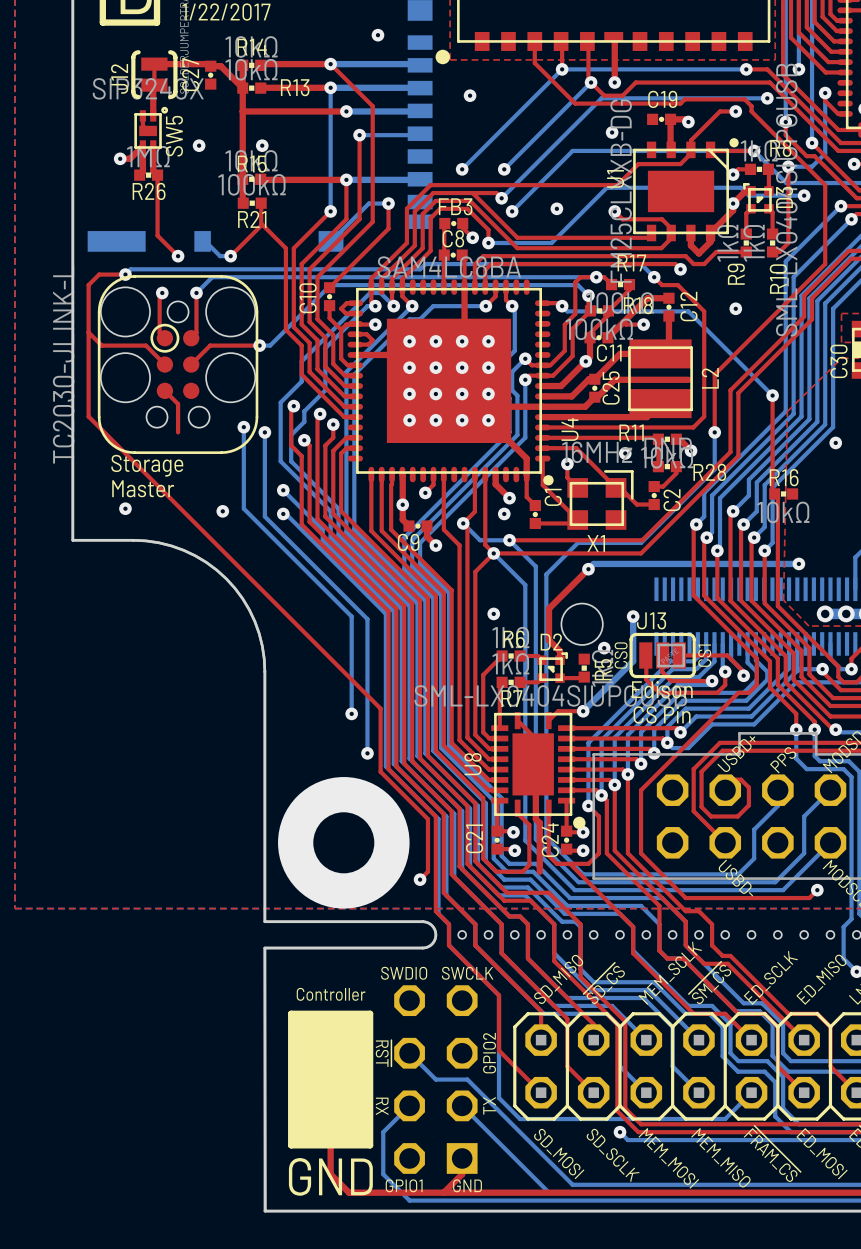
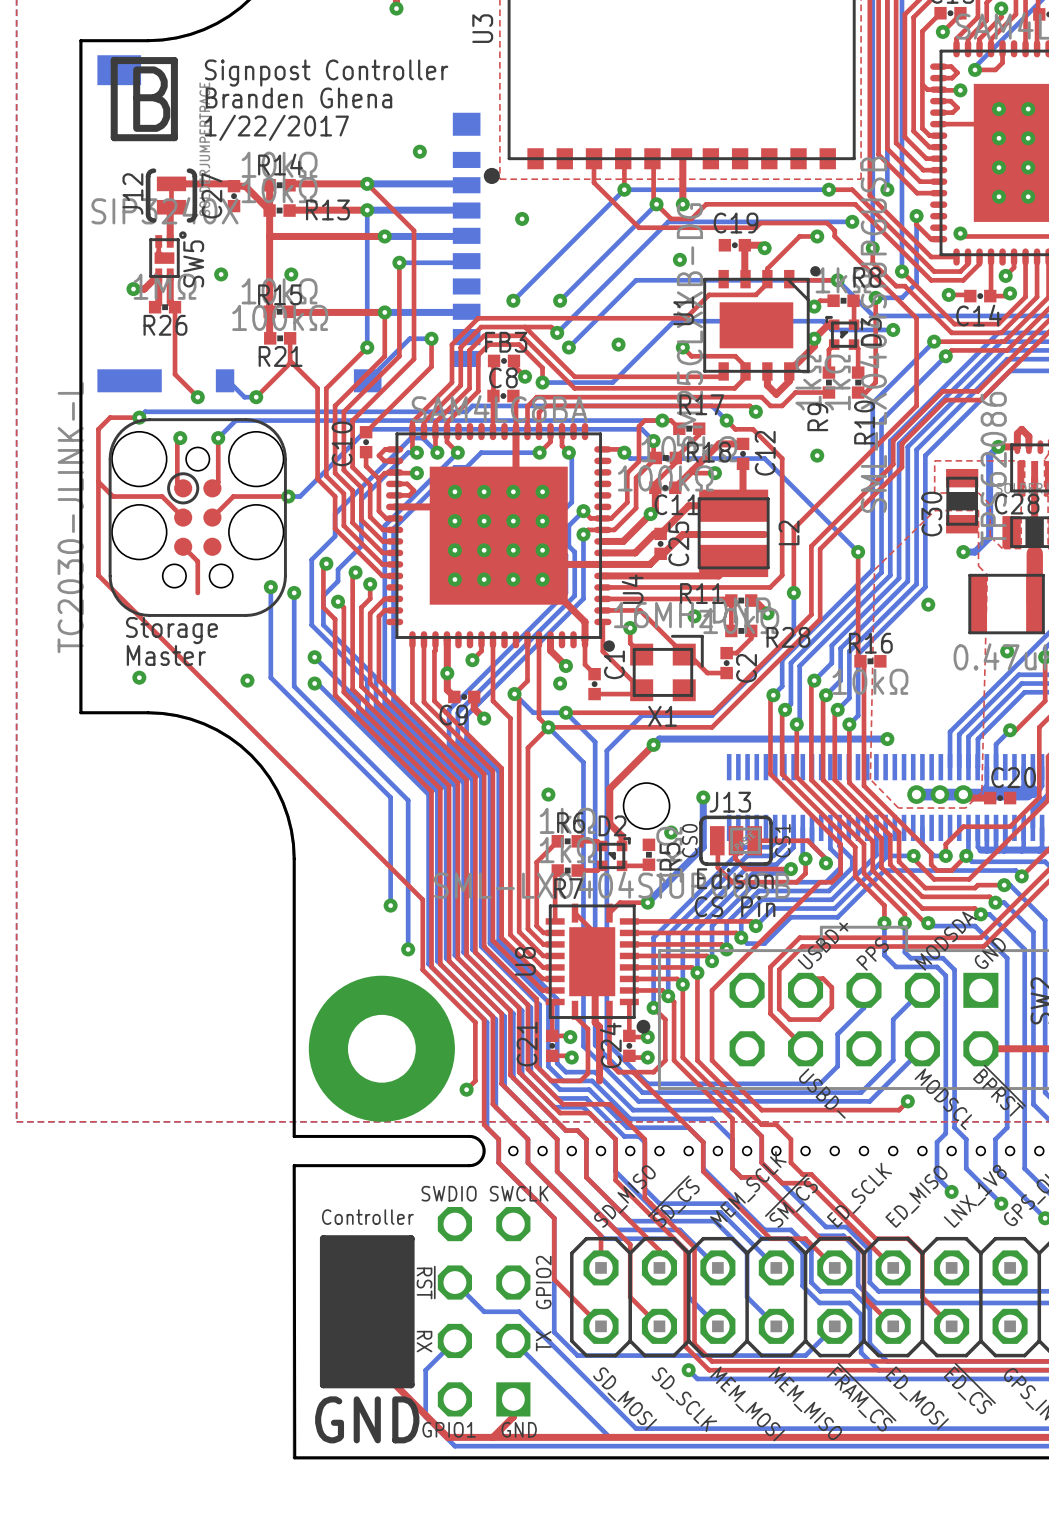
top track: (330, 1120) (330, 1174) (349, 1192) (403, 1192) -> (367, 1356) (447, 1437)

